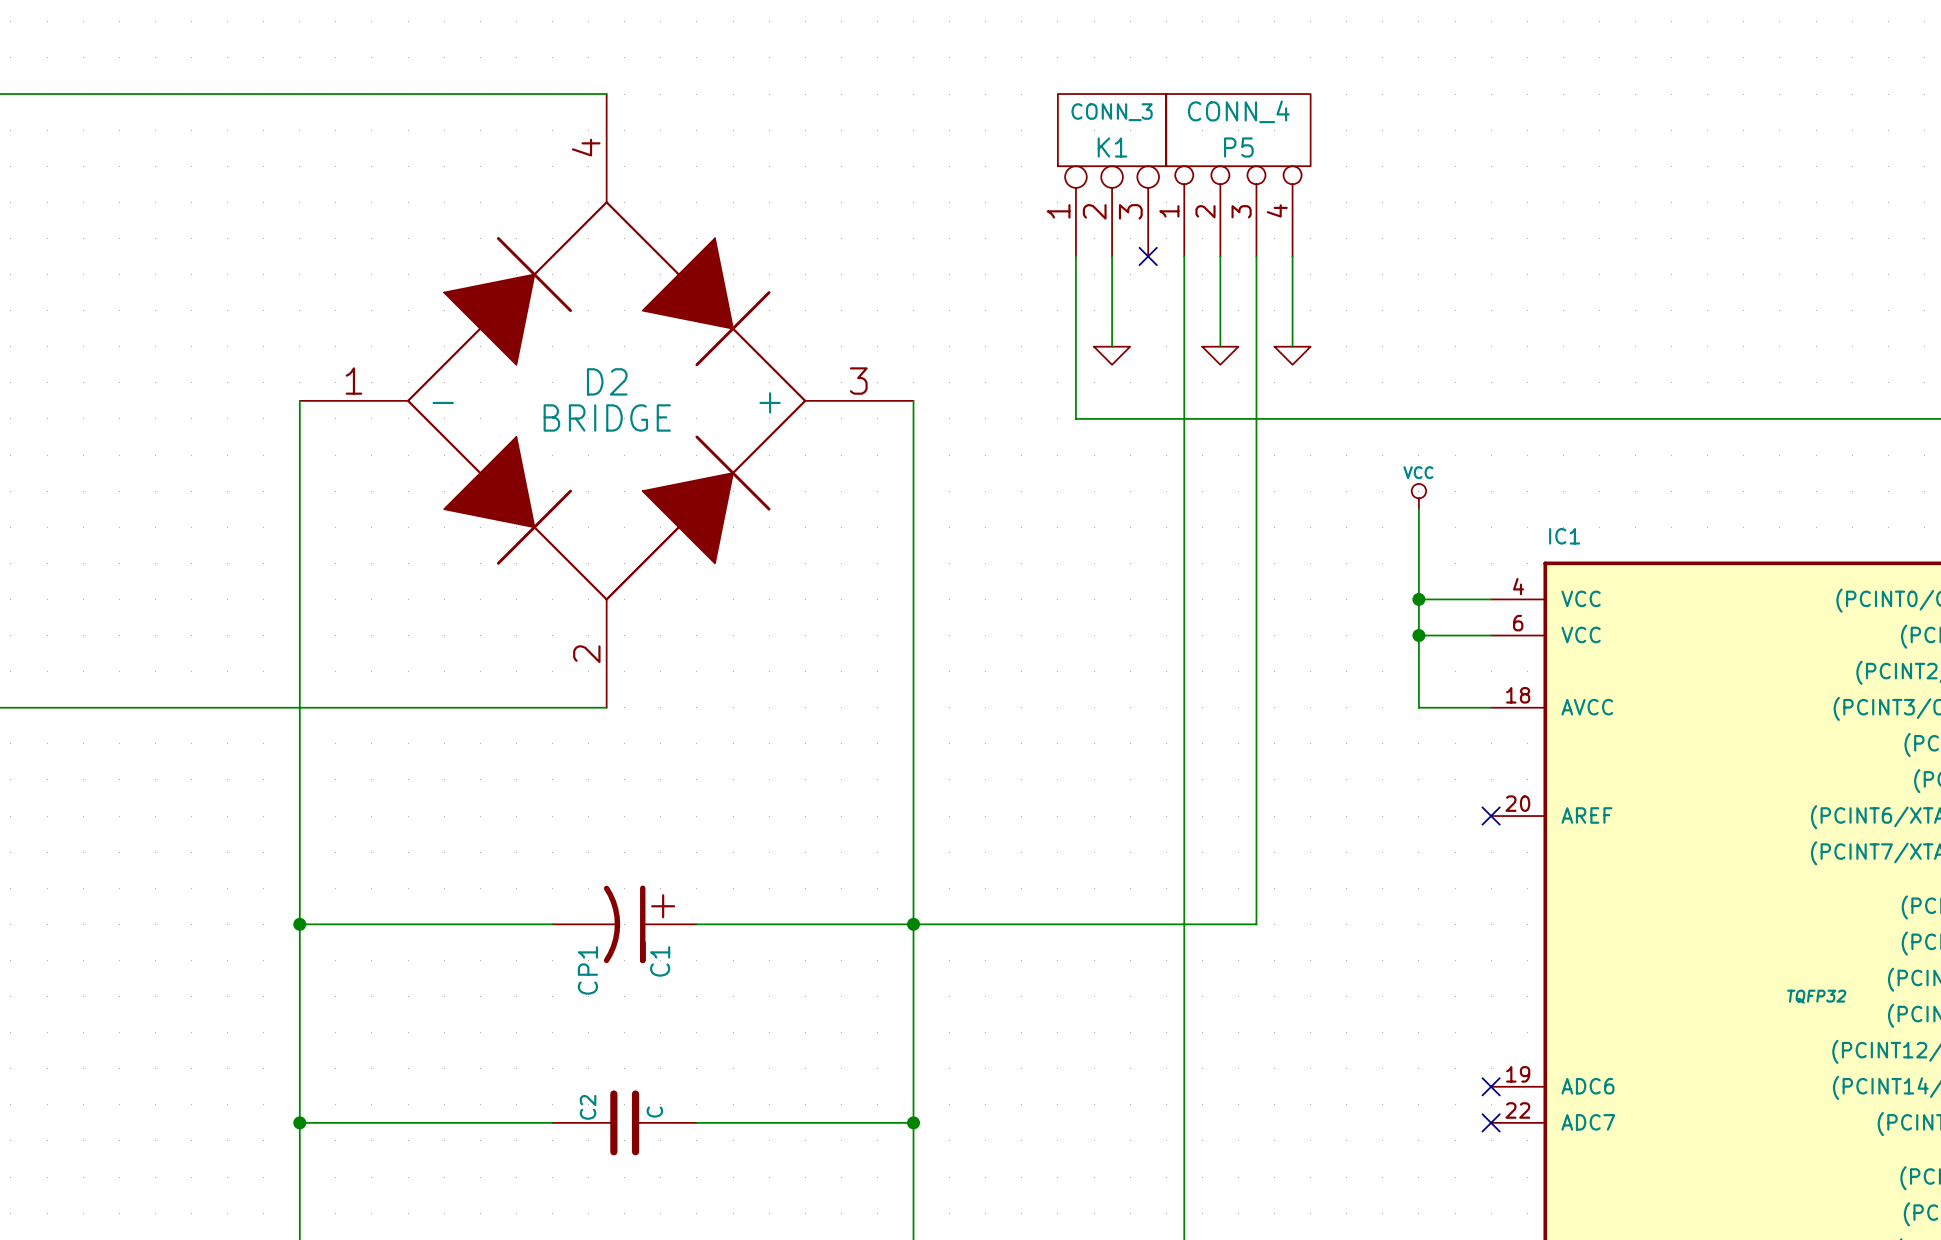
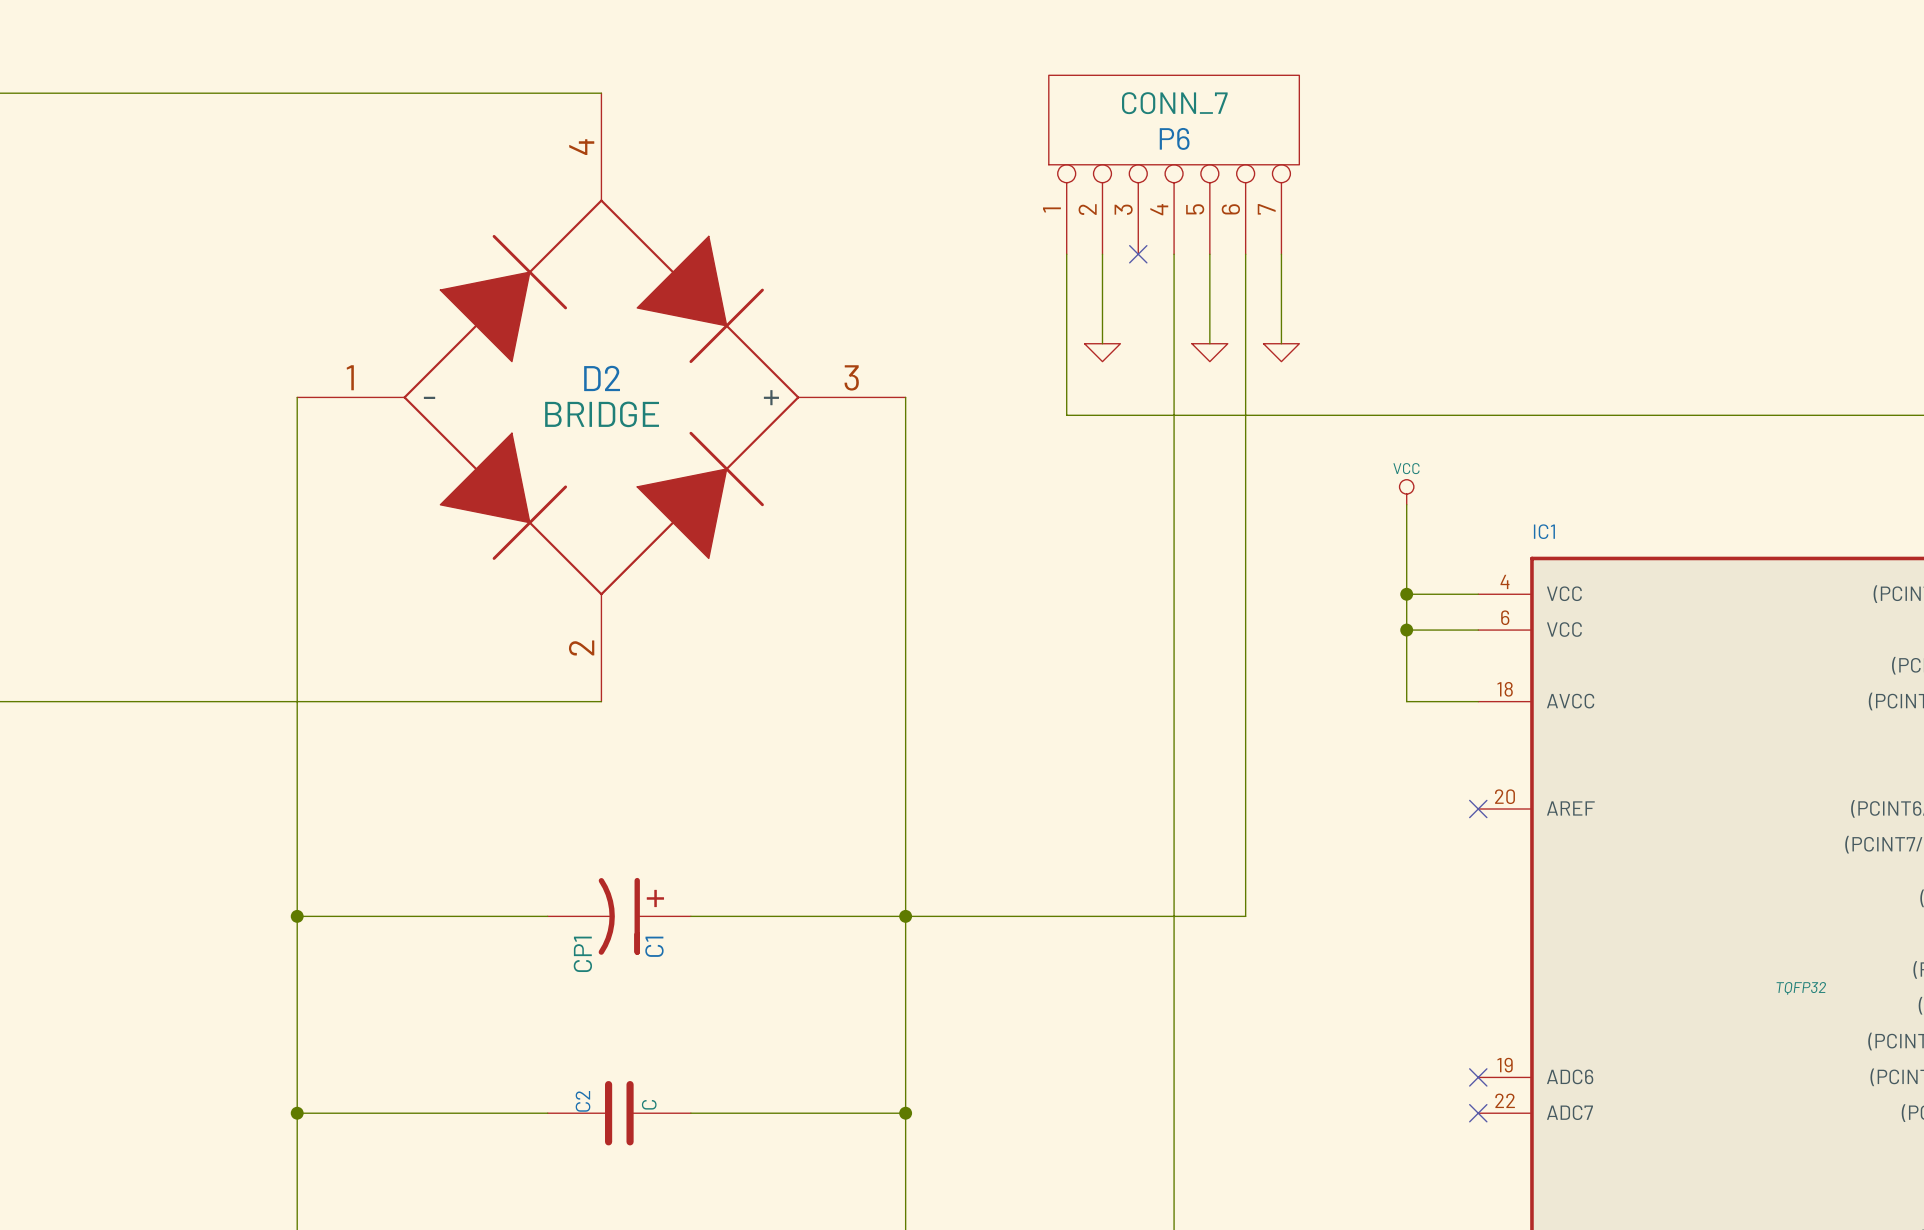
P6: none -> CONN_7 (1174, 164)
K1: CONN_3 (1112, 175) -> none
P5: CONN_4 (1238, 175) -> none

